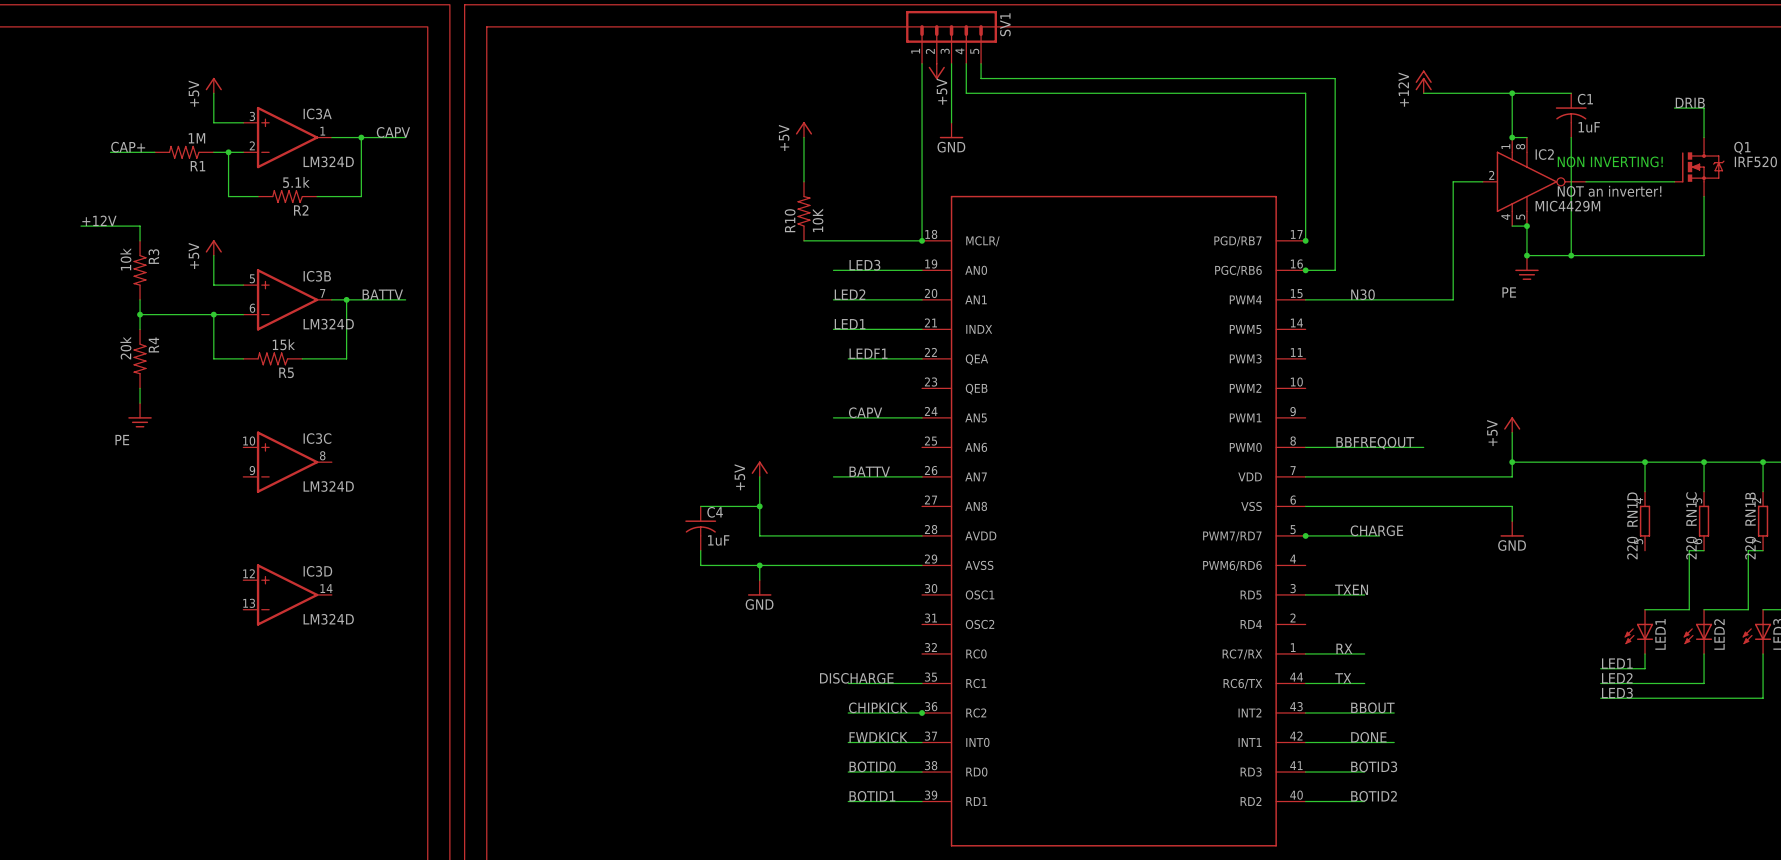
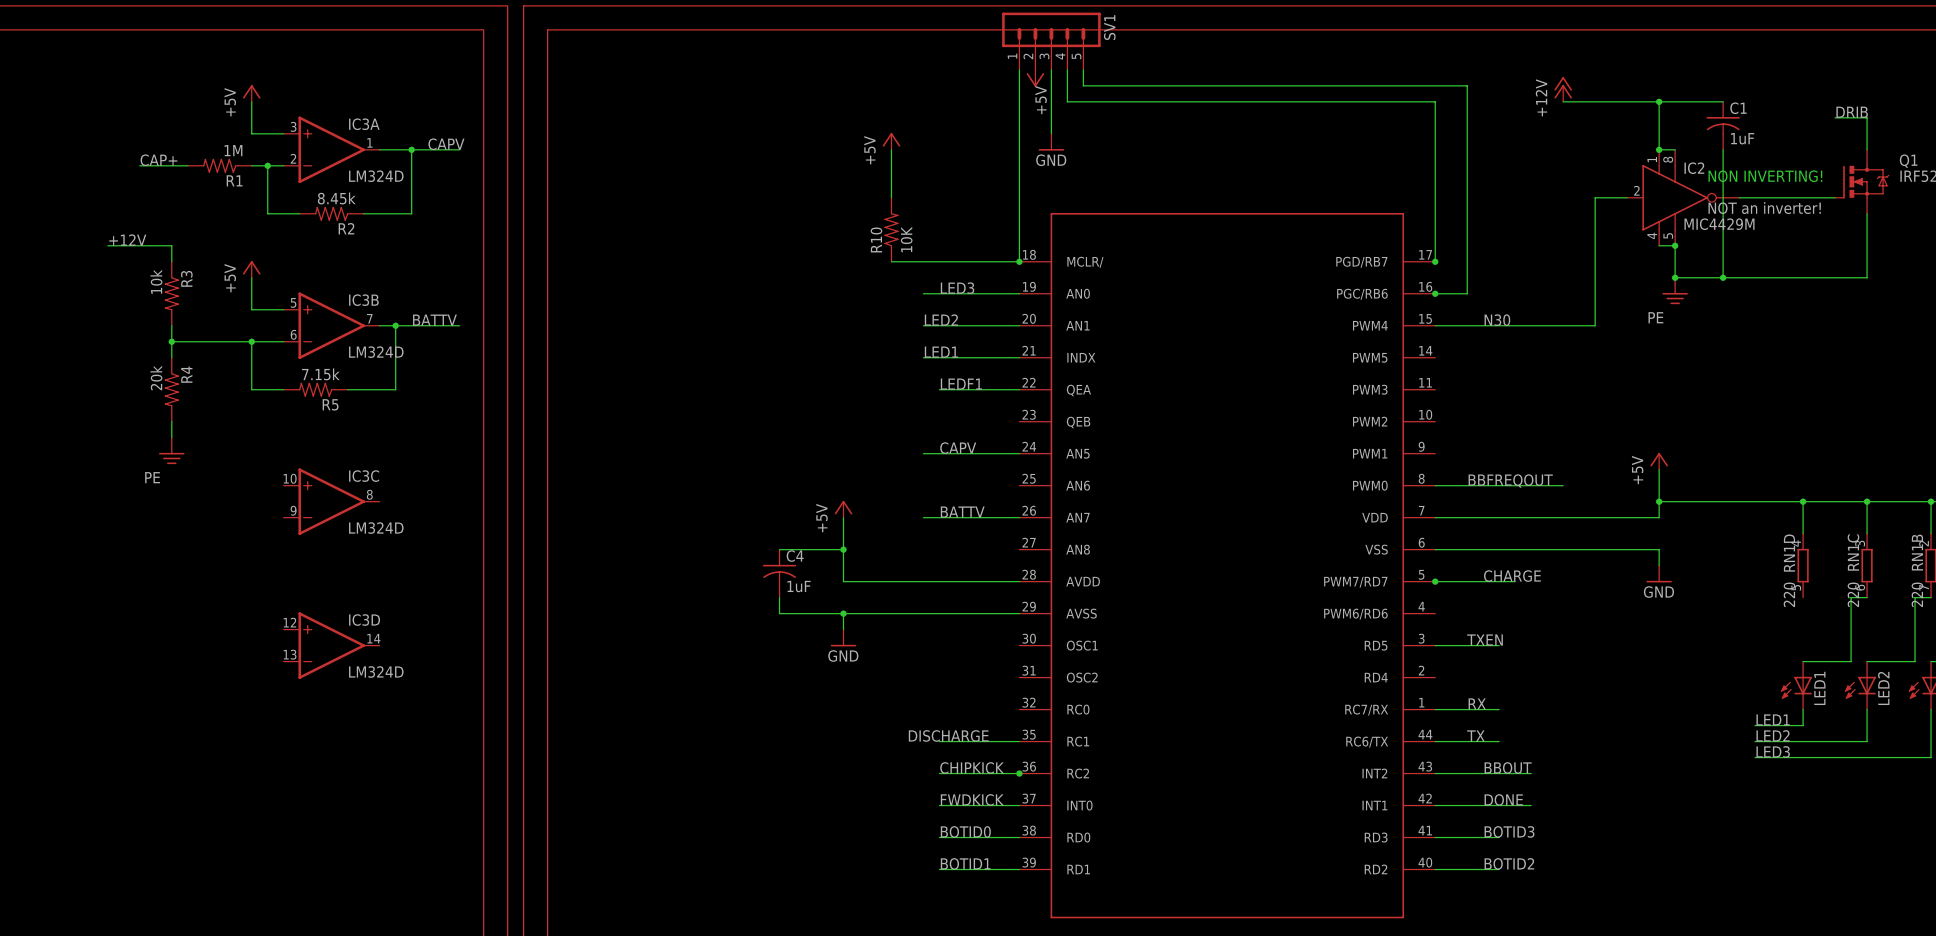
R2 value: 5.1k (296, 182) -> 8.45k (336, 198)
R5 value: 15k (283, 344) -> 7.15k (320, 374)

